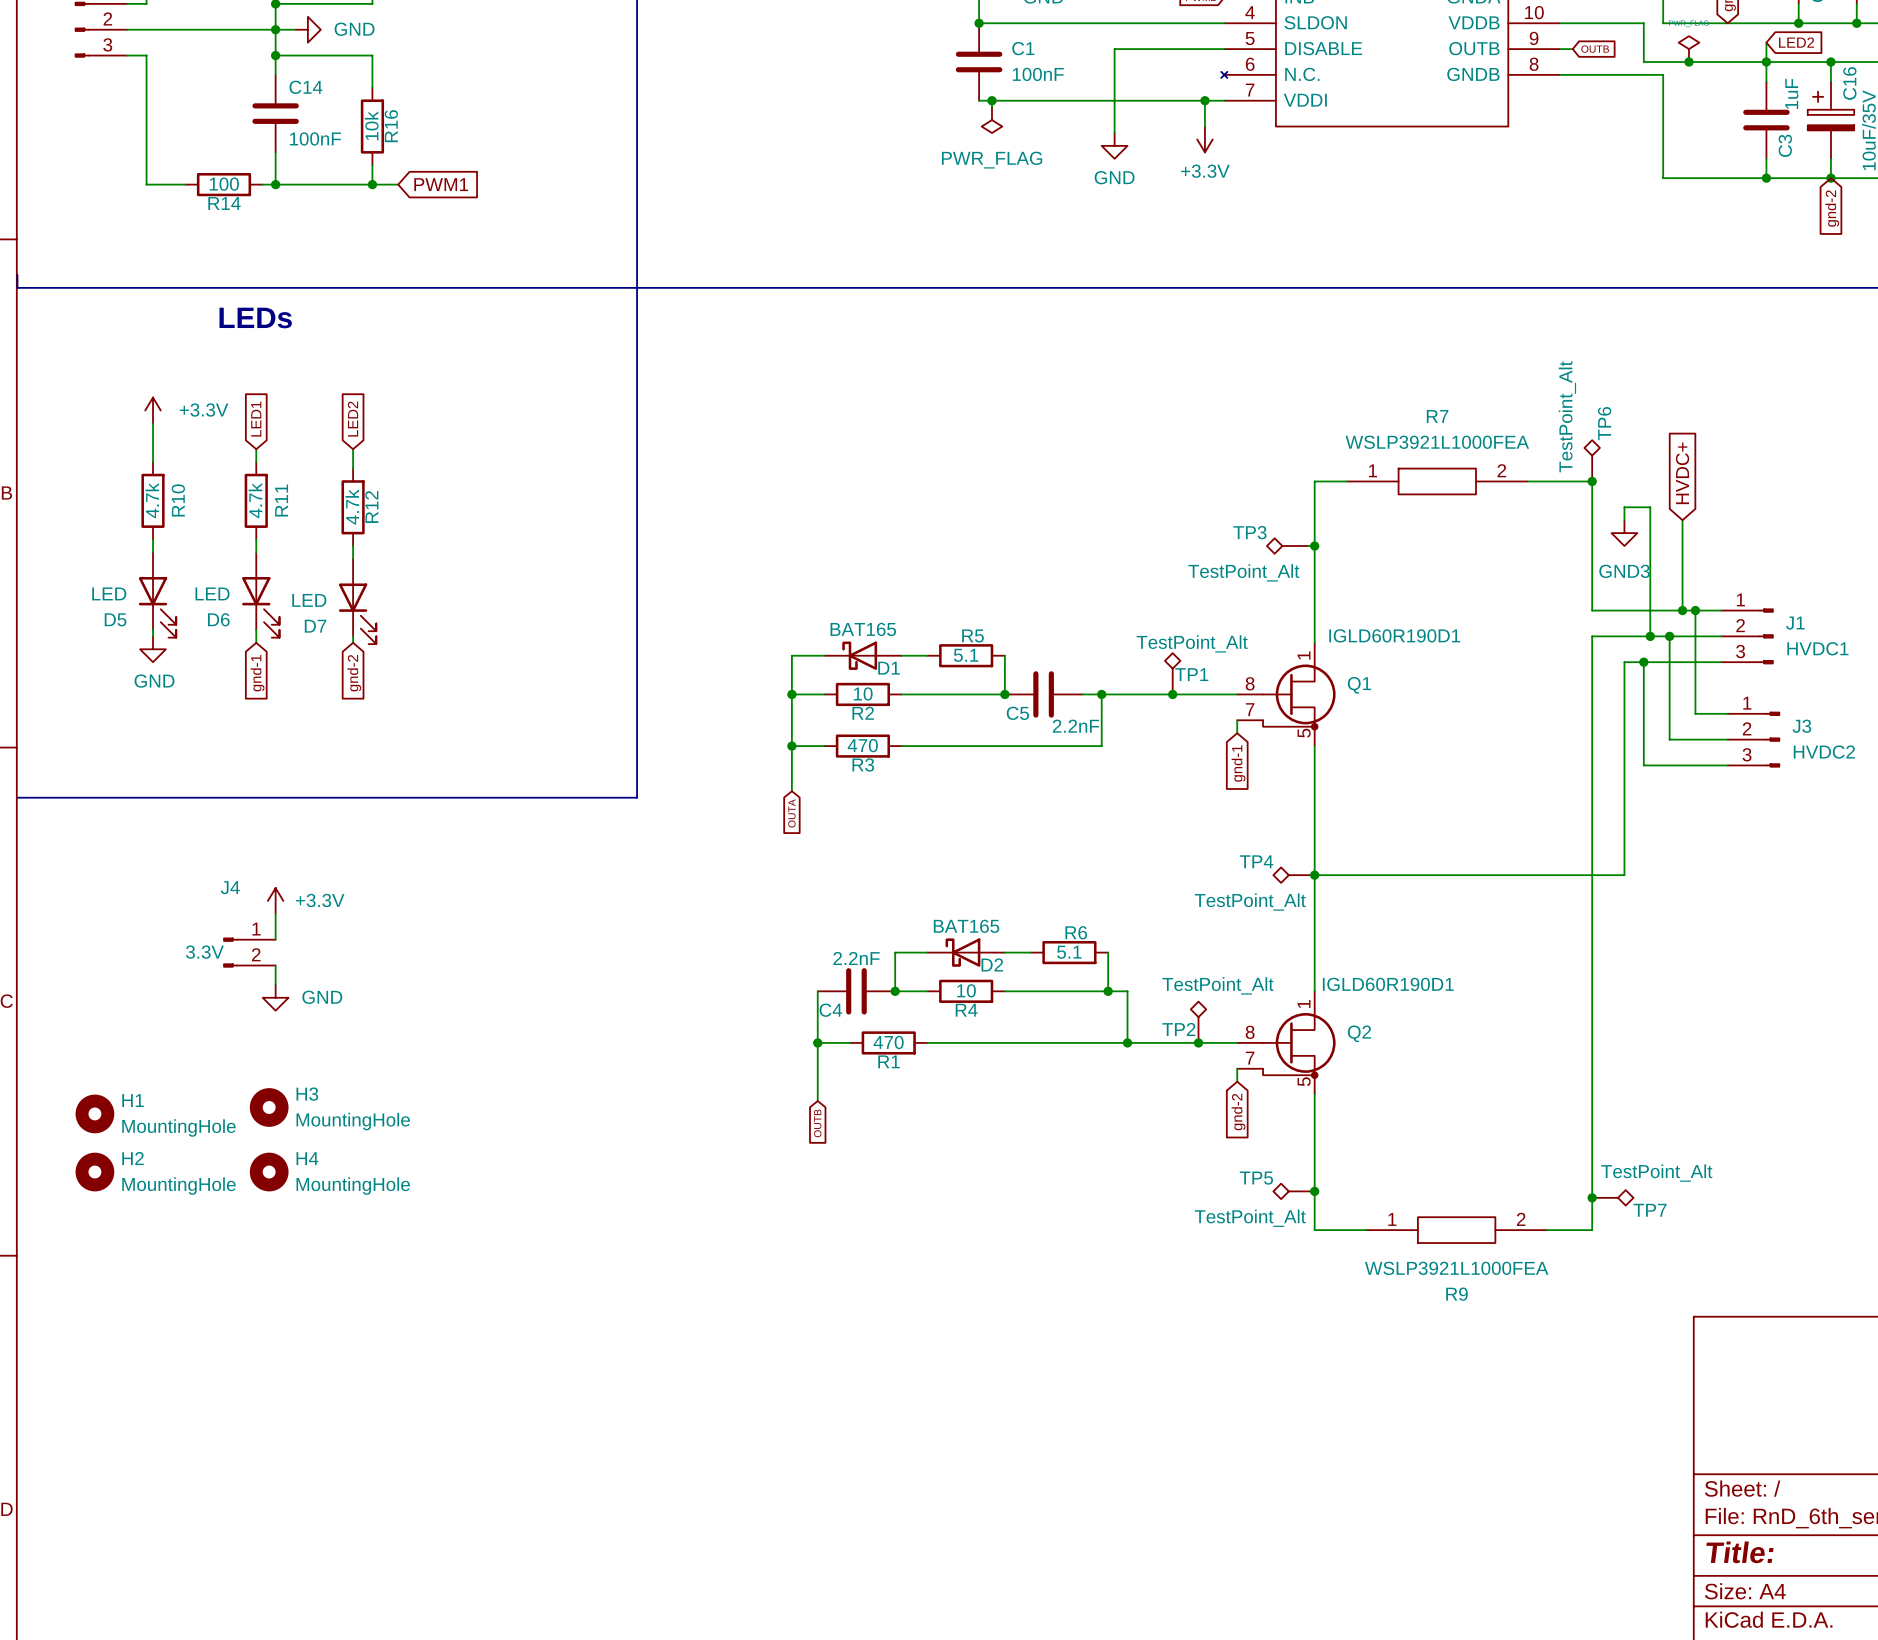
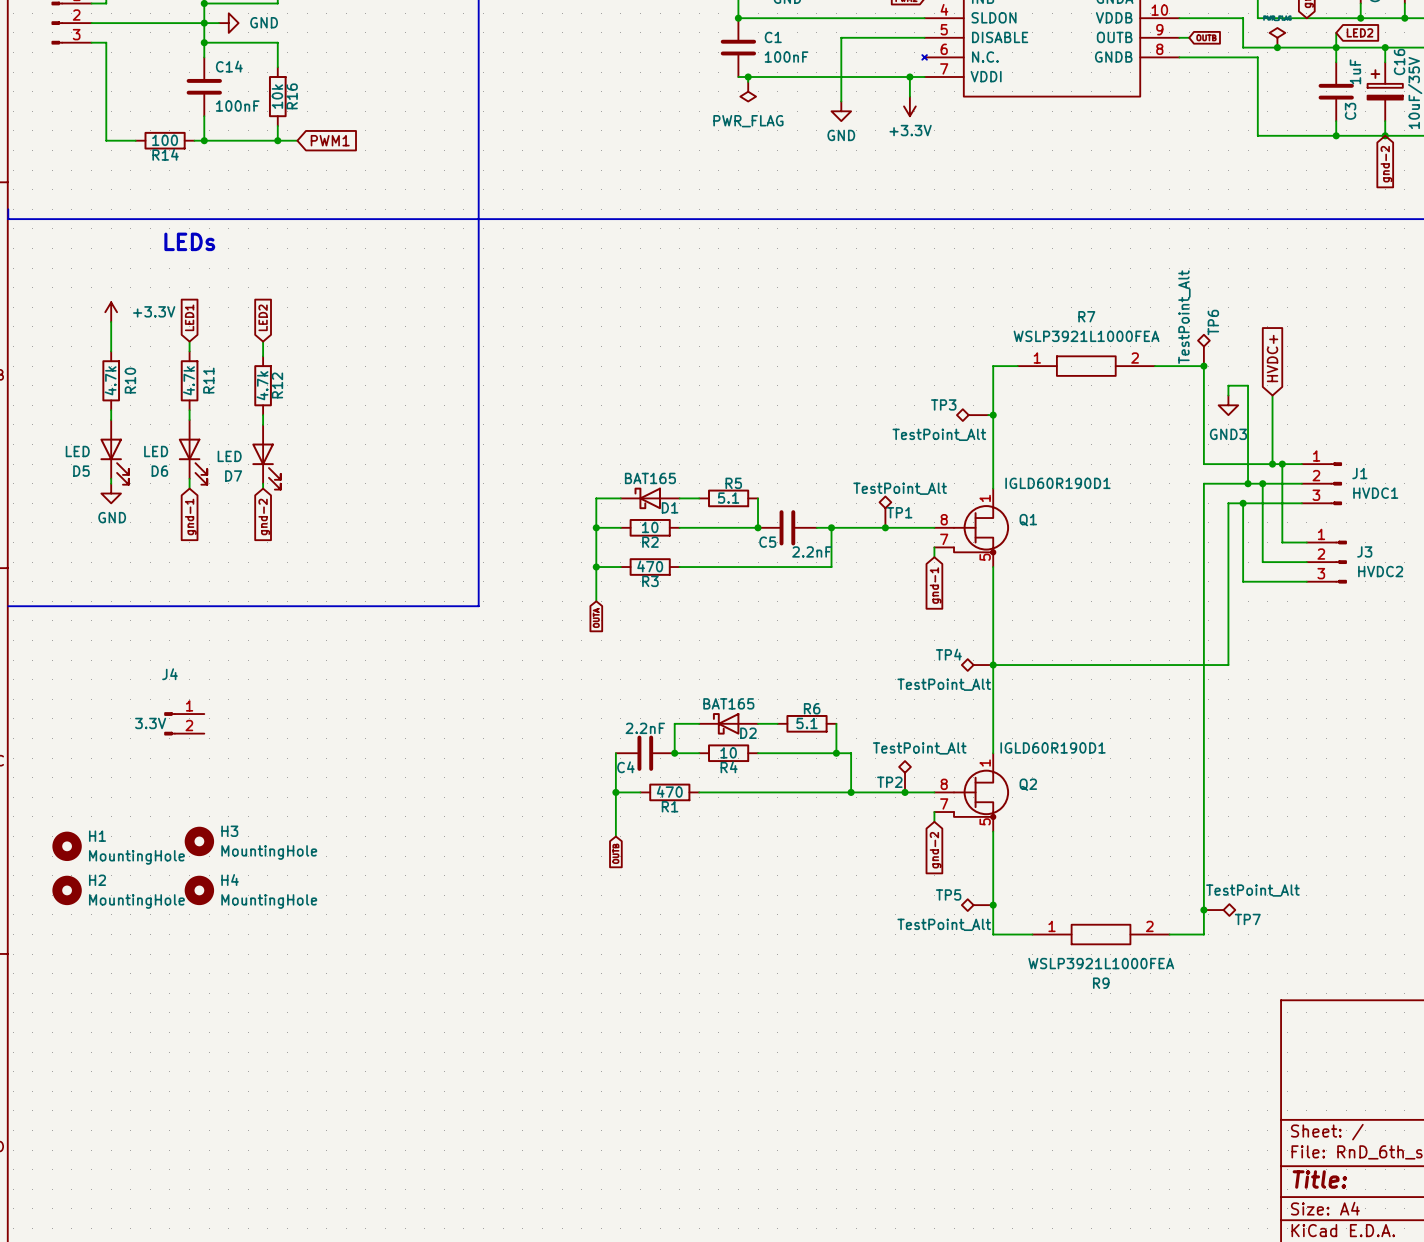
power symbol: +3.3V (275, 900) -> none
wire: (275, 913) (275, 939) -> none
wire: (275, 965) (275, 984) -> none
power symbol: GND (275, 997) -> none

